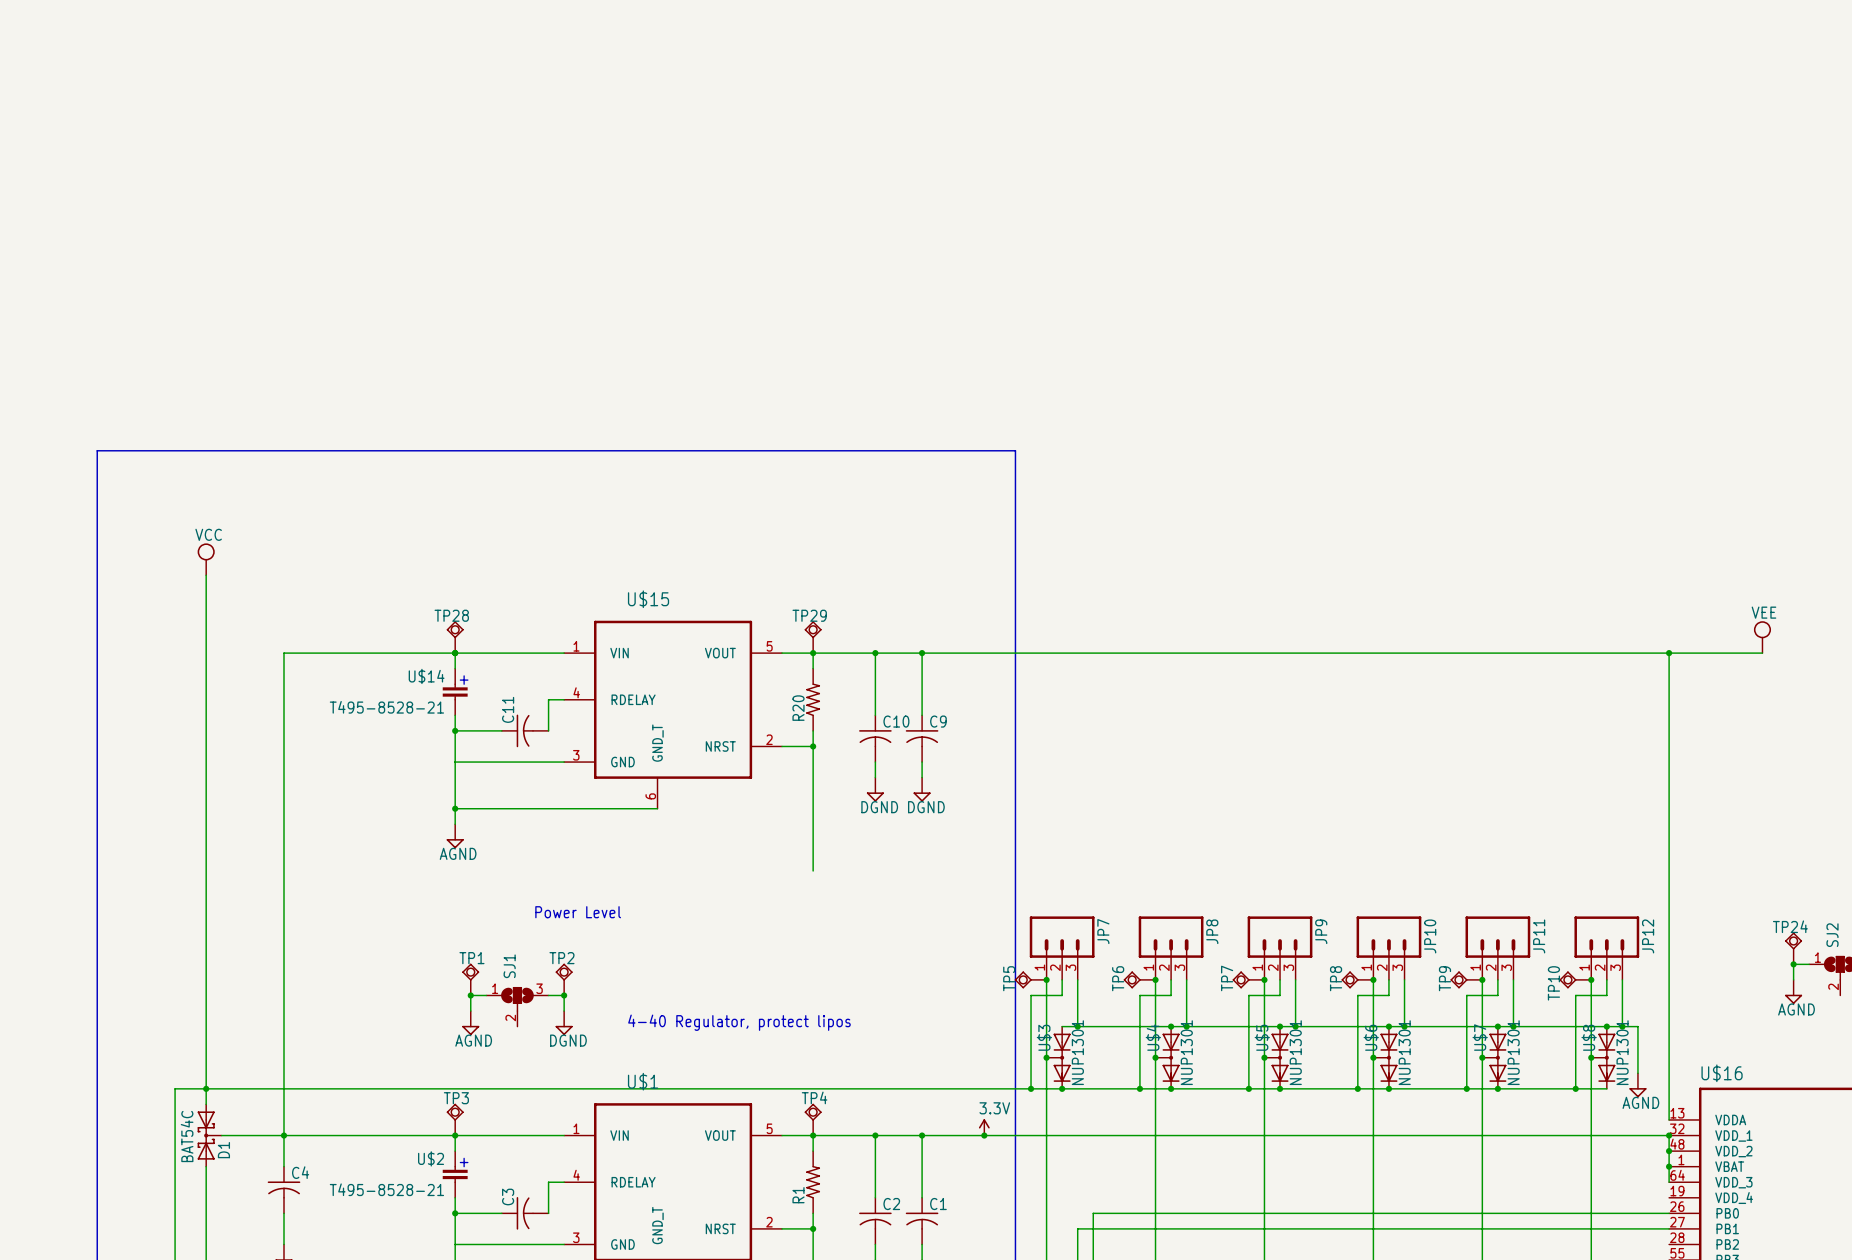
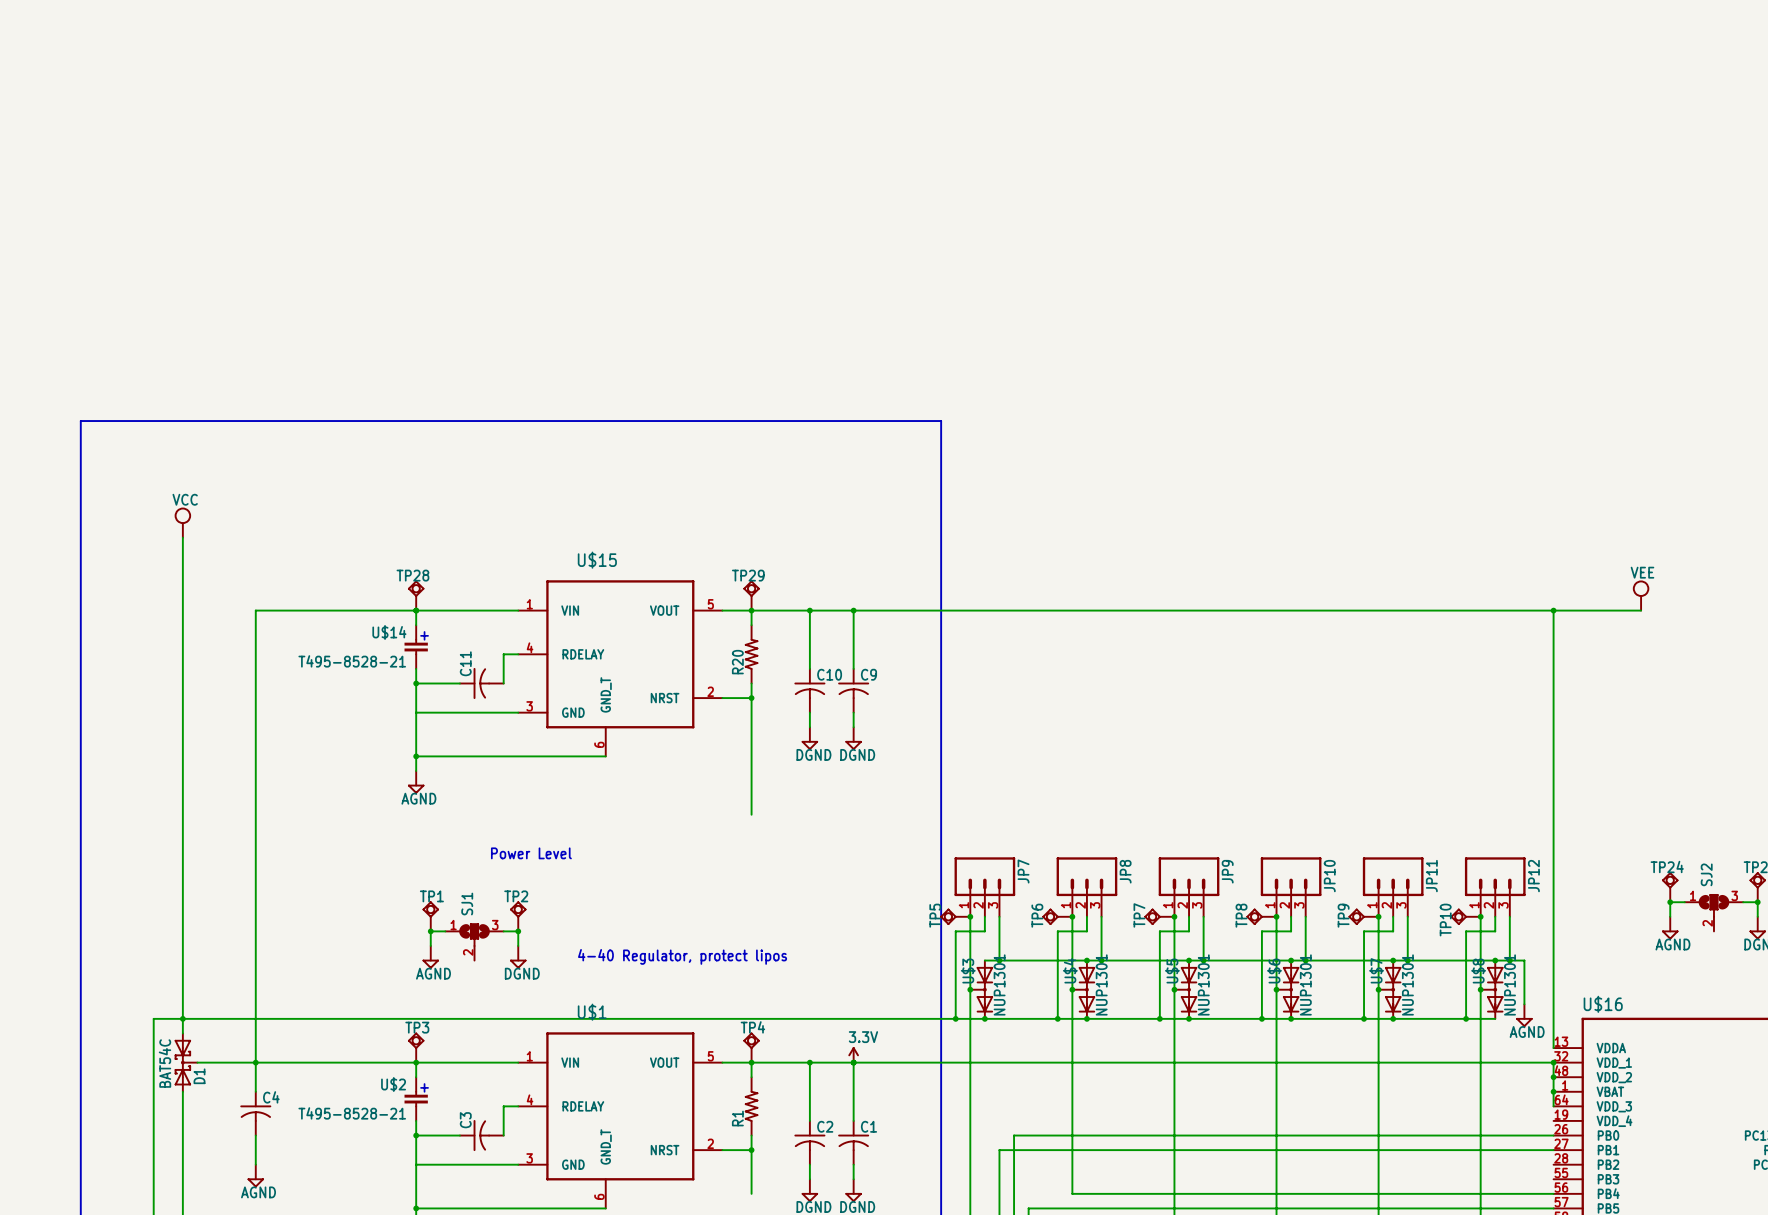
power symbol position: 3.3V (984, 1127) -> 3.3V (853, 1054)
junction: (984, 1135) -> none

